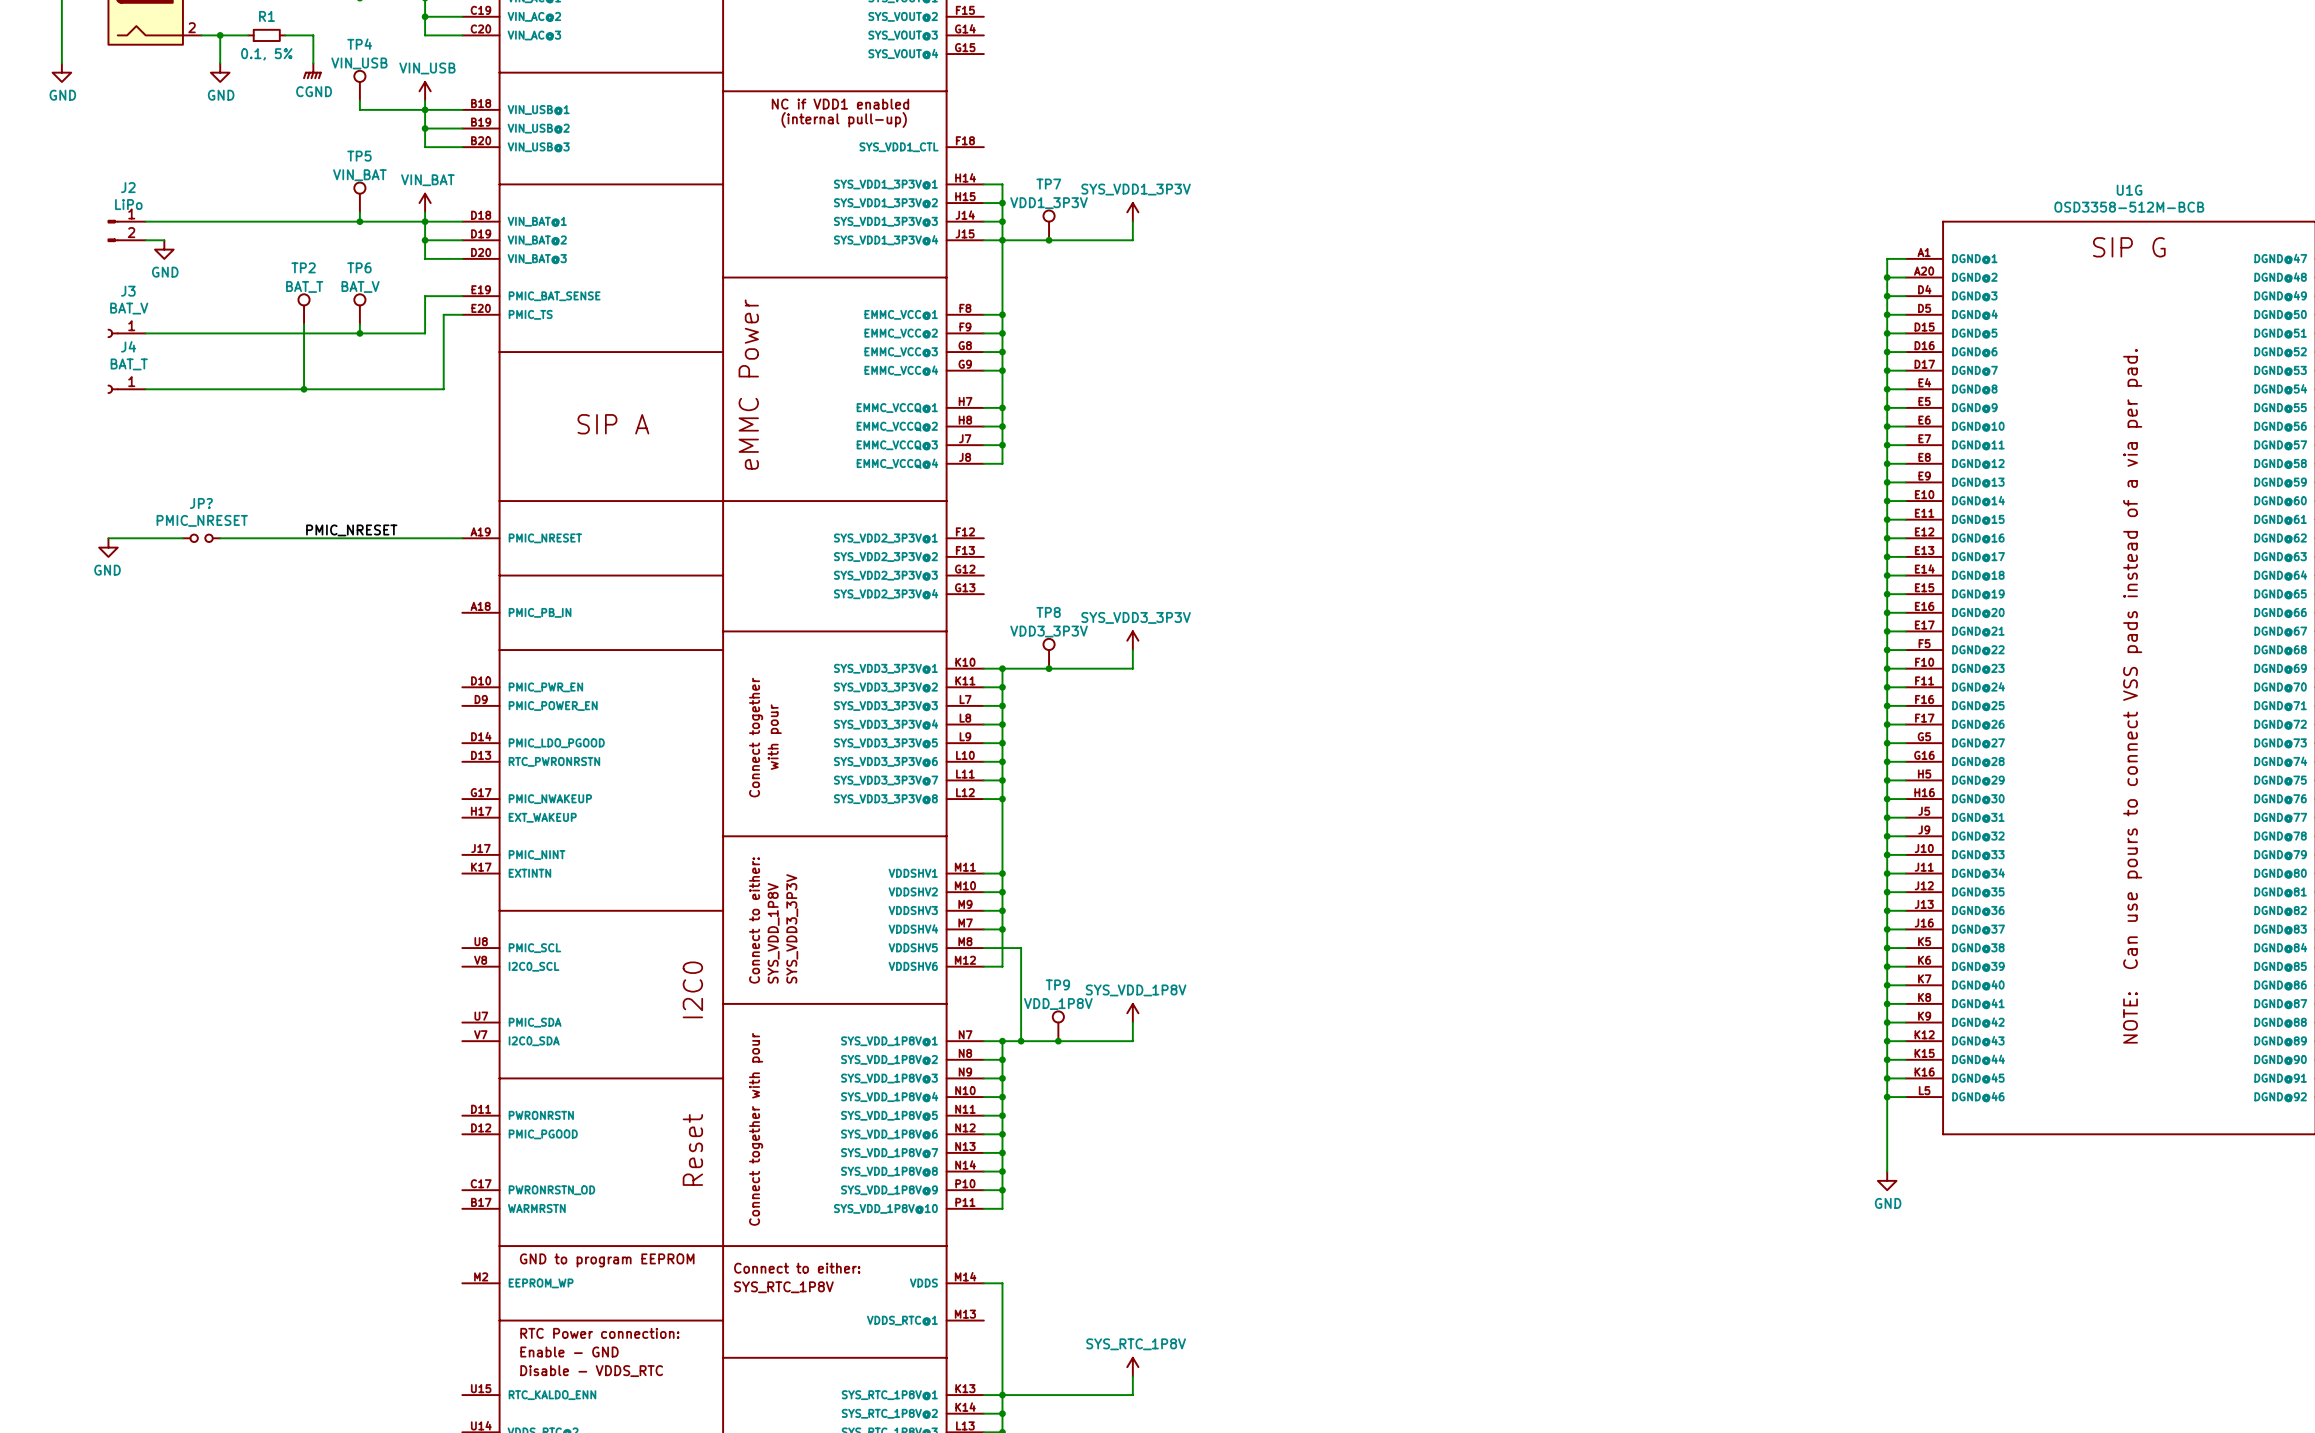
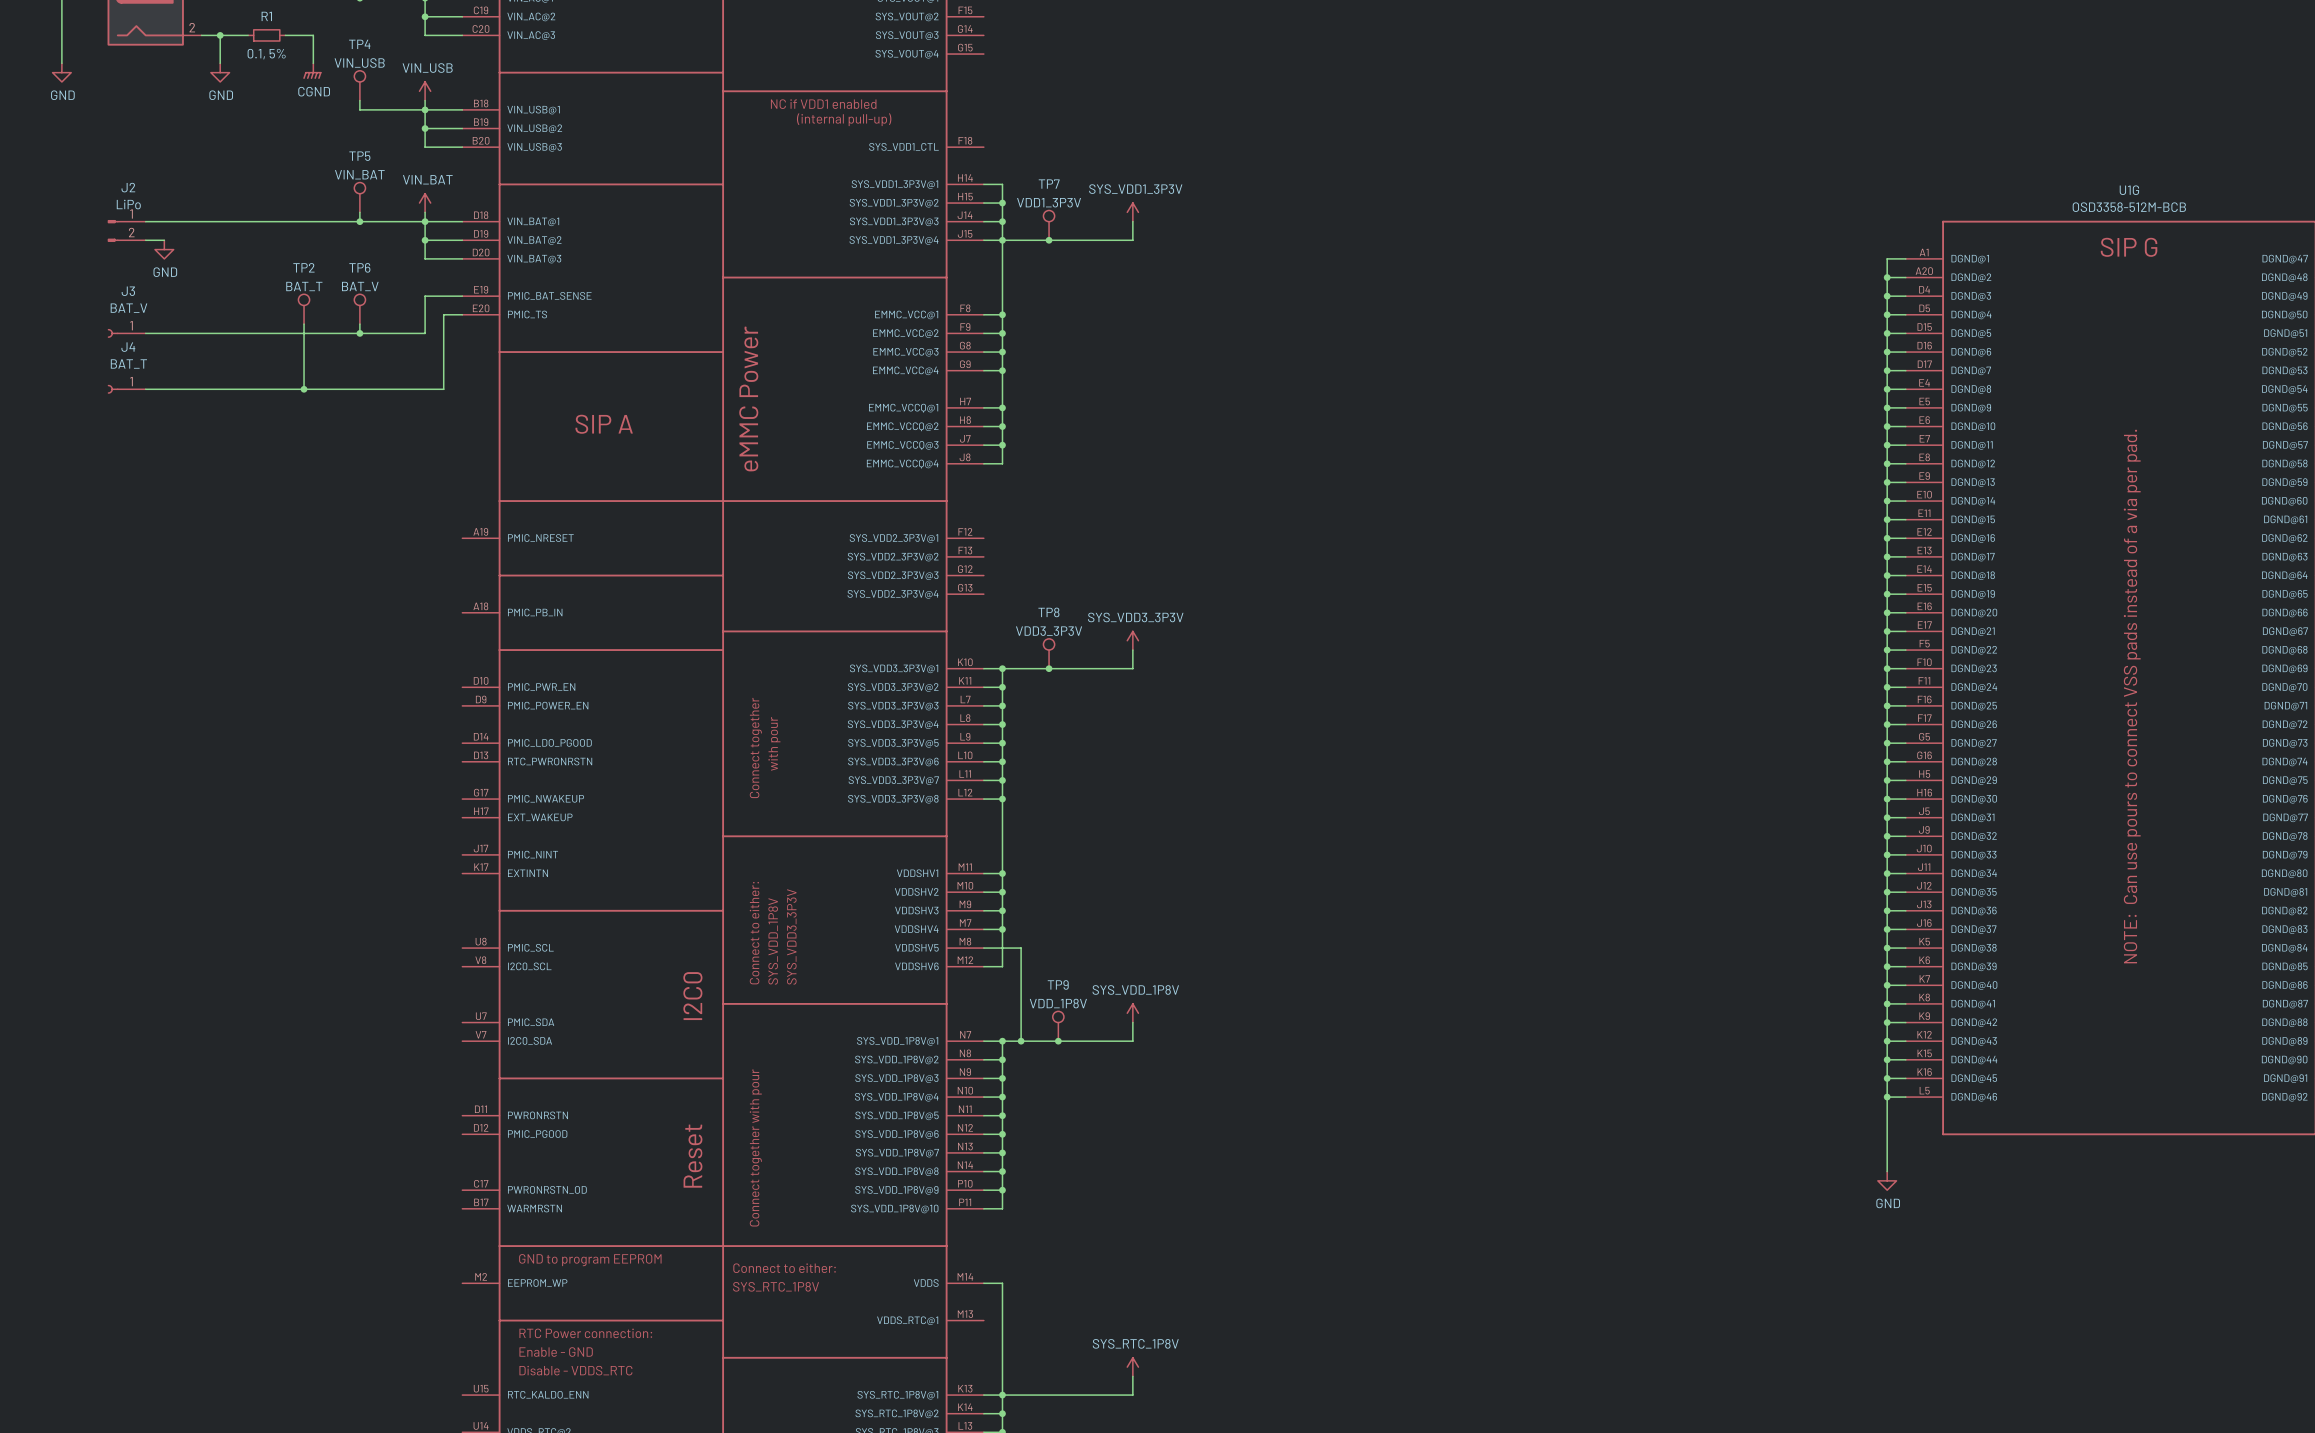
label: PMIC_NRESET (351, 530) -> none
wire: (108, 538) (182, 538) -> none
JP?: PMIC_NRESET (201, 538) -> none
wire: (220, 538) (462, 538) -> none
power symbol: GND (108, 547) -> none

